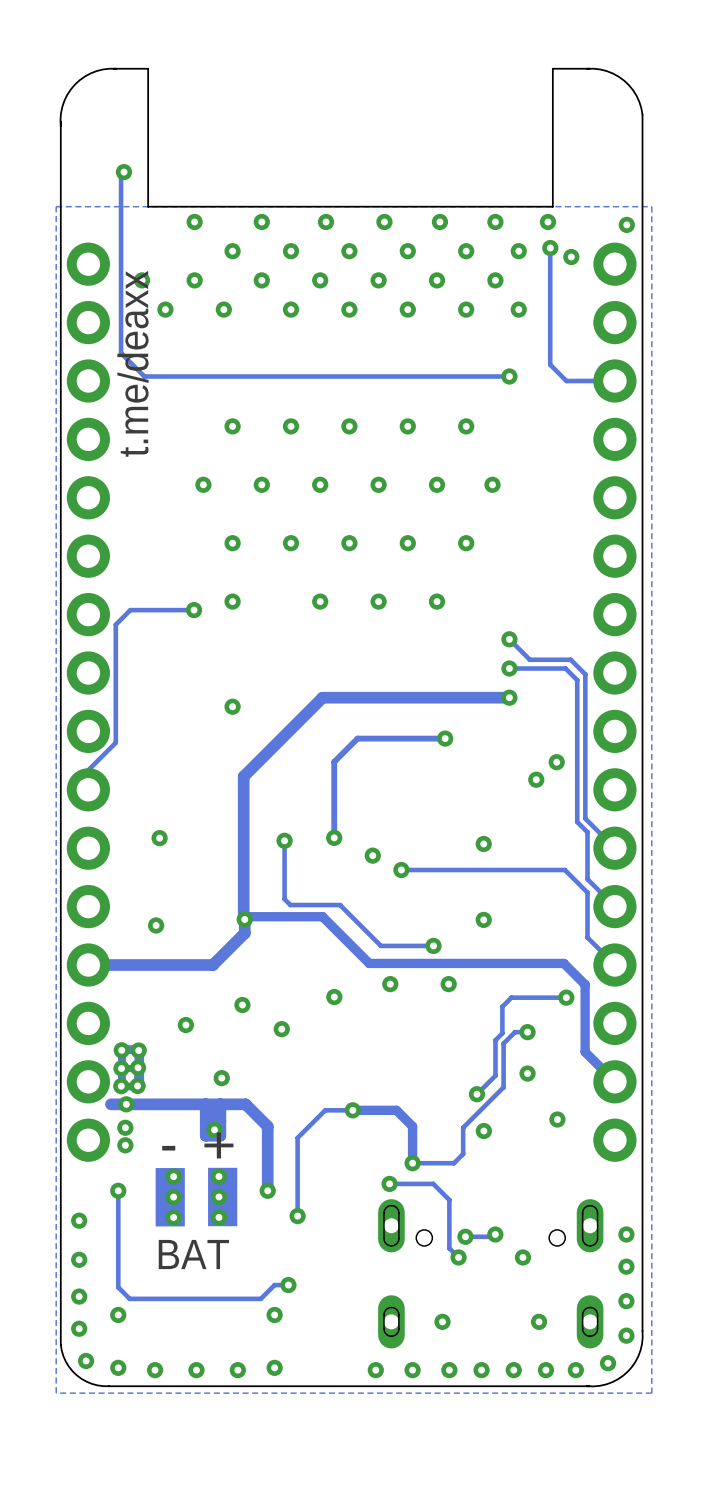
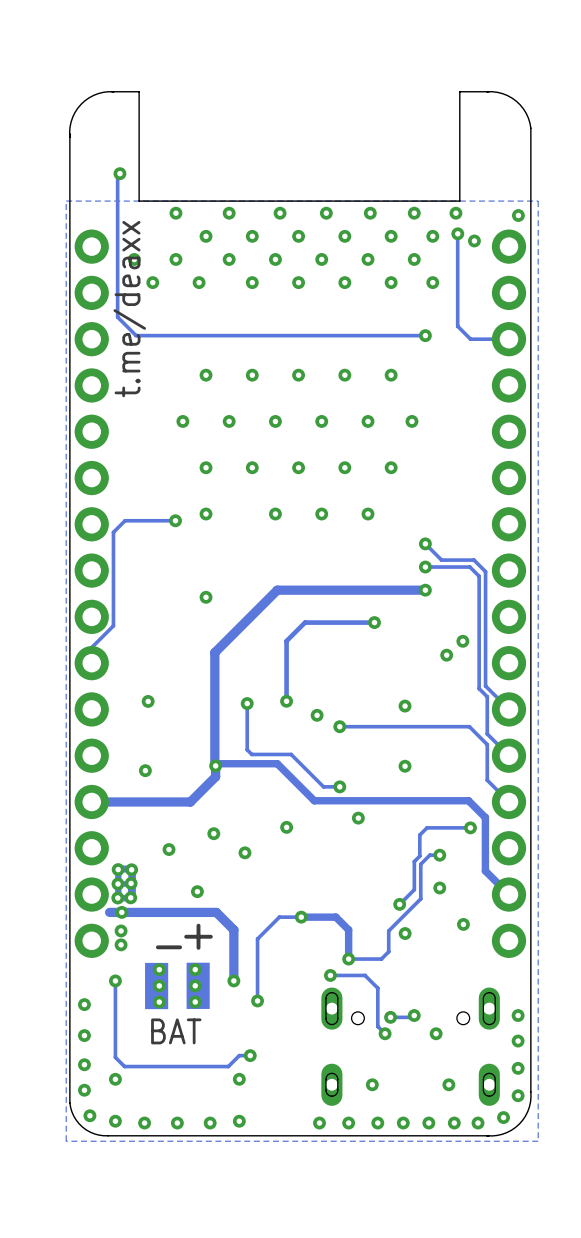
via: none -> (339, 786)
track: (433, 945) (401, 945) -> none
via: (433, 945) -> none
via: (390, 984) -> none
via: (448, 984) -> none
via: none -> (358, 818)
track: (205, 1104) (205, 1135) (220, 1135) (220, 1104) (214, 1110) (214, 1129) -> none
via: (214, 1129) -> none

